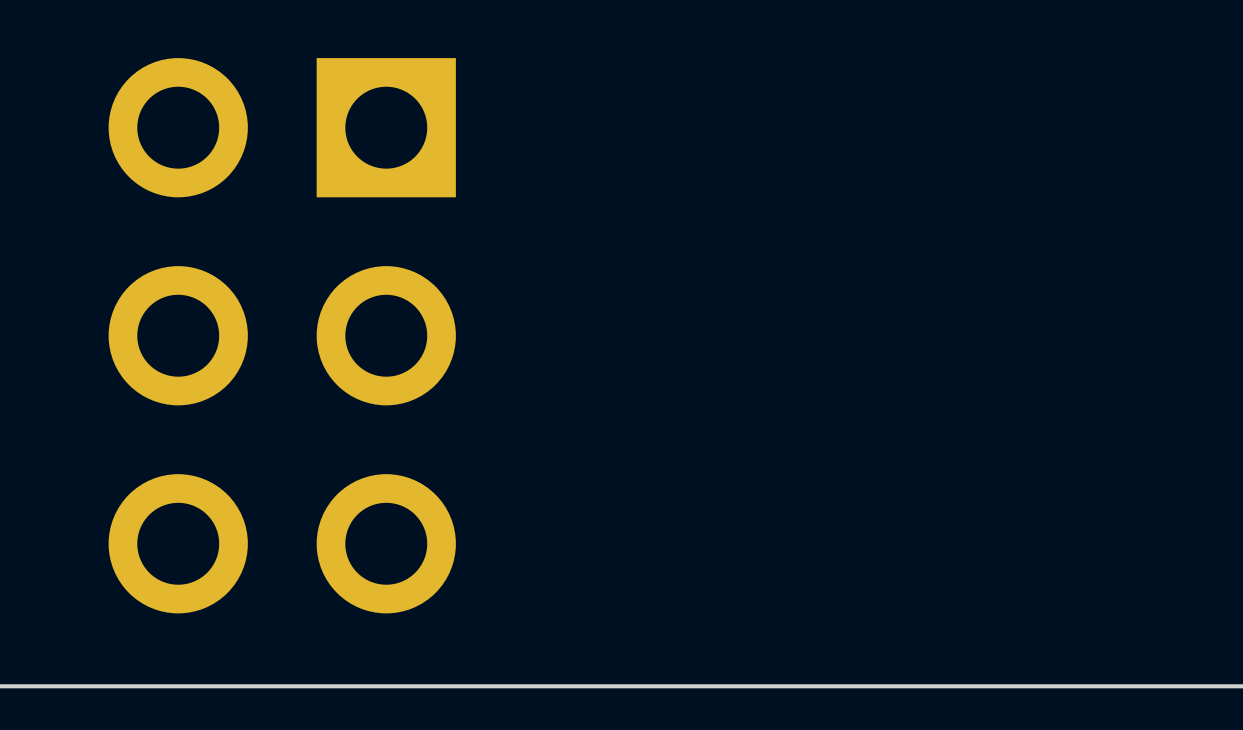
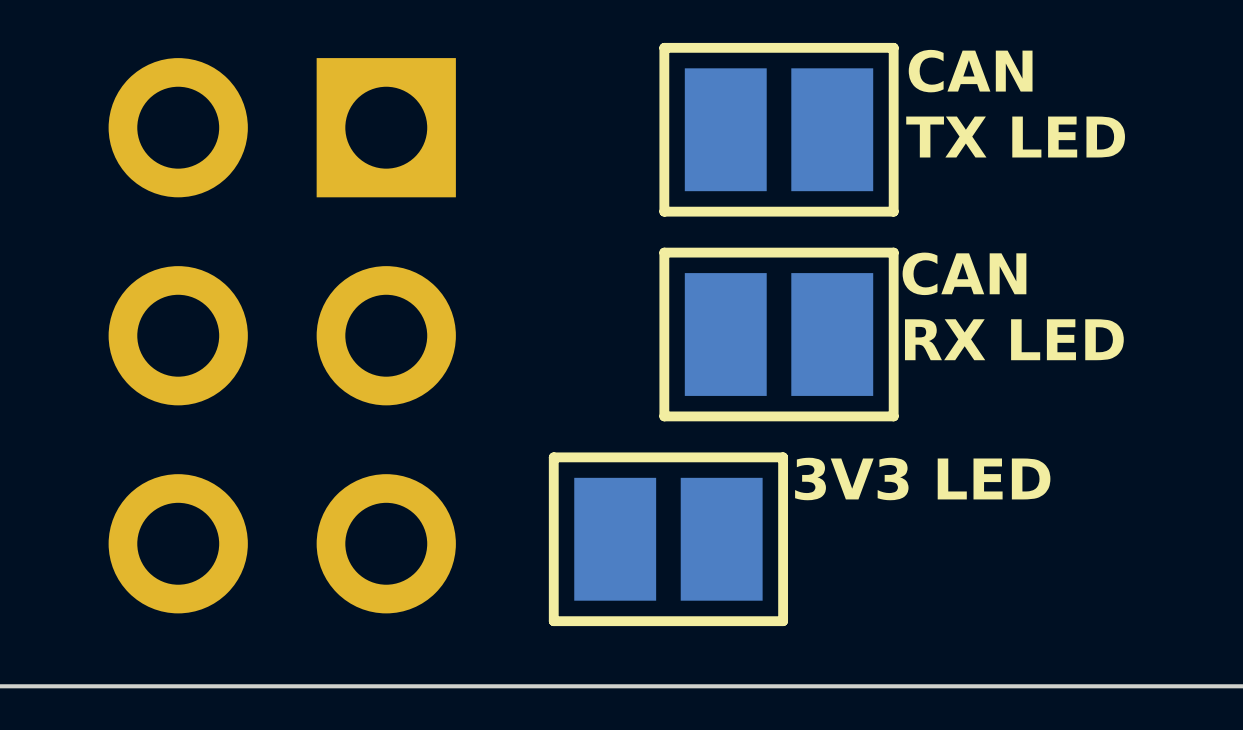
text: none -> CAN (970, 71)
part: none -> (779, 129)
text: none -> TX LED (1015, 137)
text: none -> CAN (964, 273)
part: none -> (779, 334)
text: none -> RX LED (1014, 339)
text: none -> 3V3 LED (922, 479)
part: none -> (668, 539)

